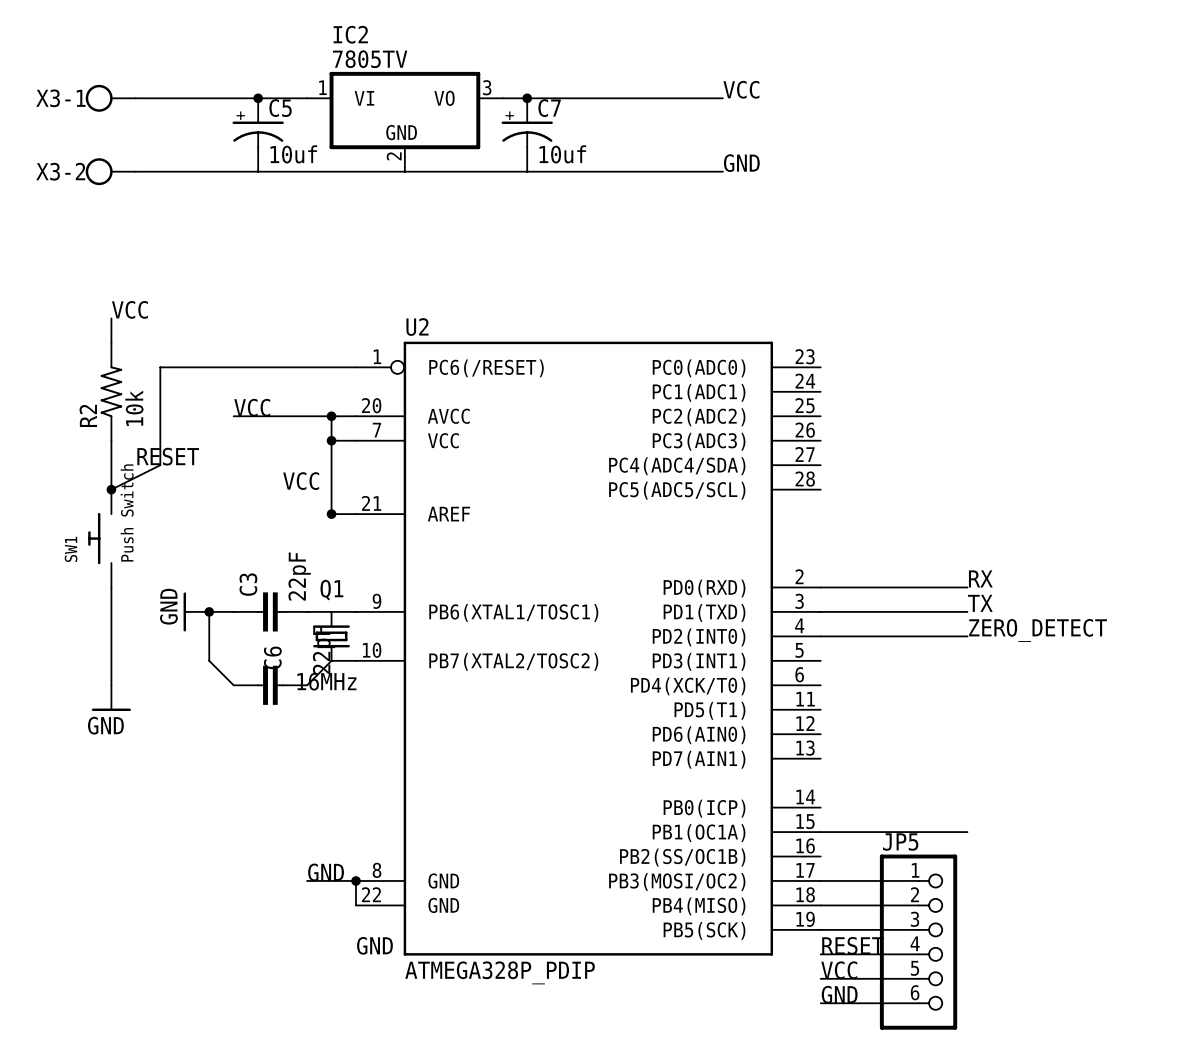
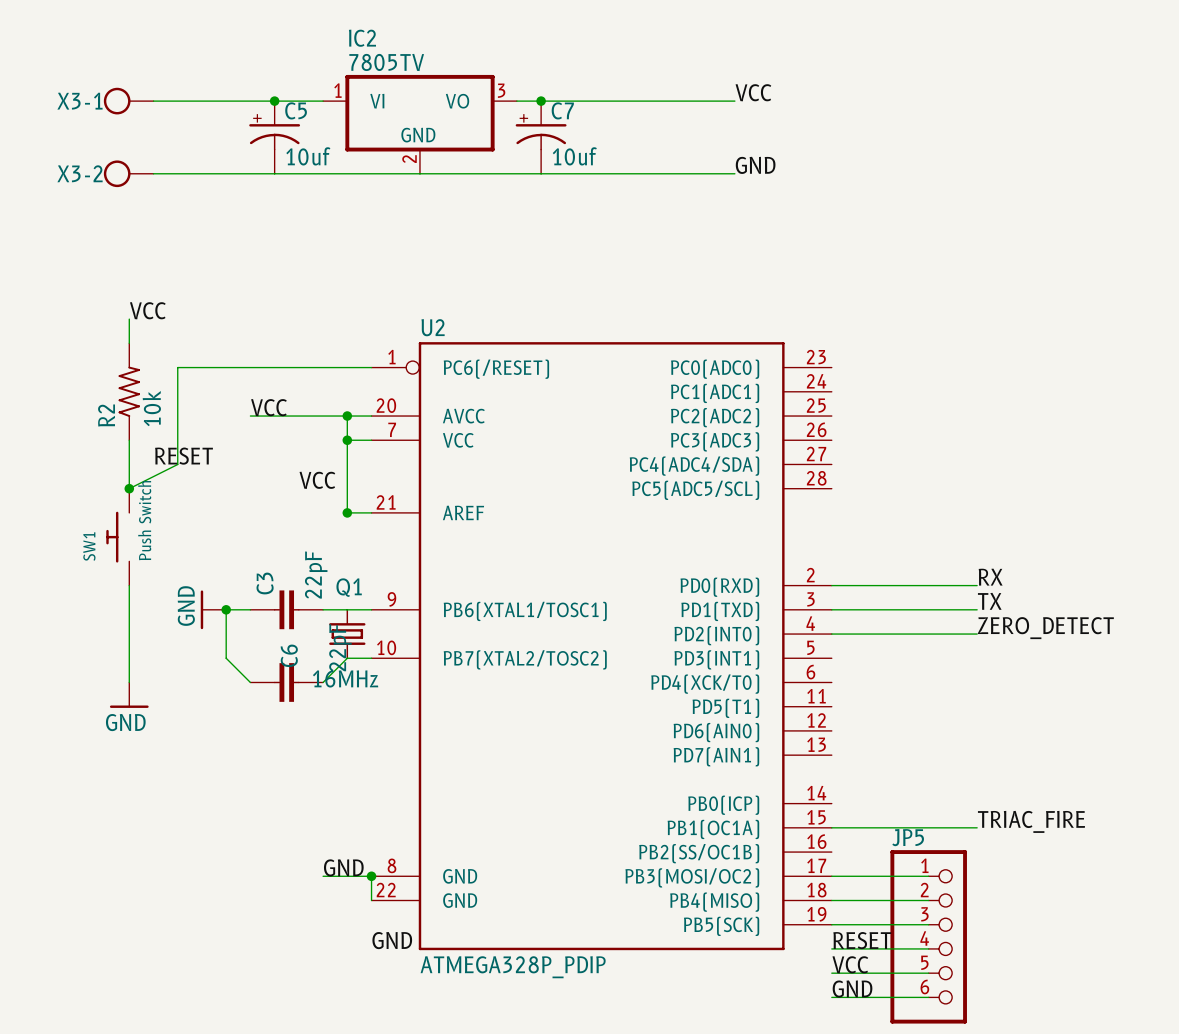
label: none -> TRIAC_FIRE (1031, 821)

